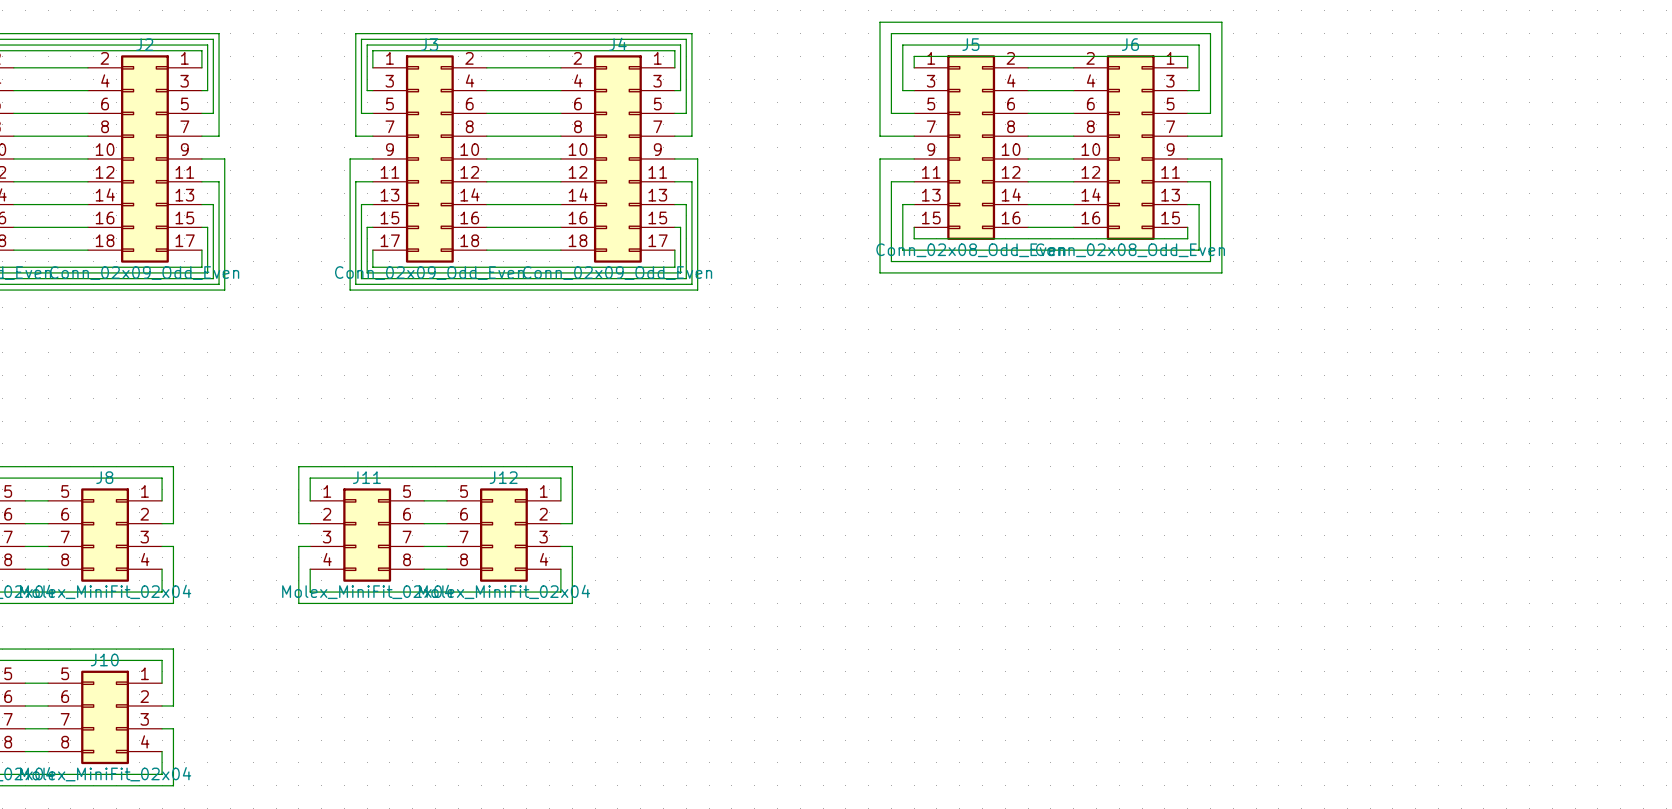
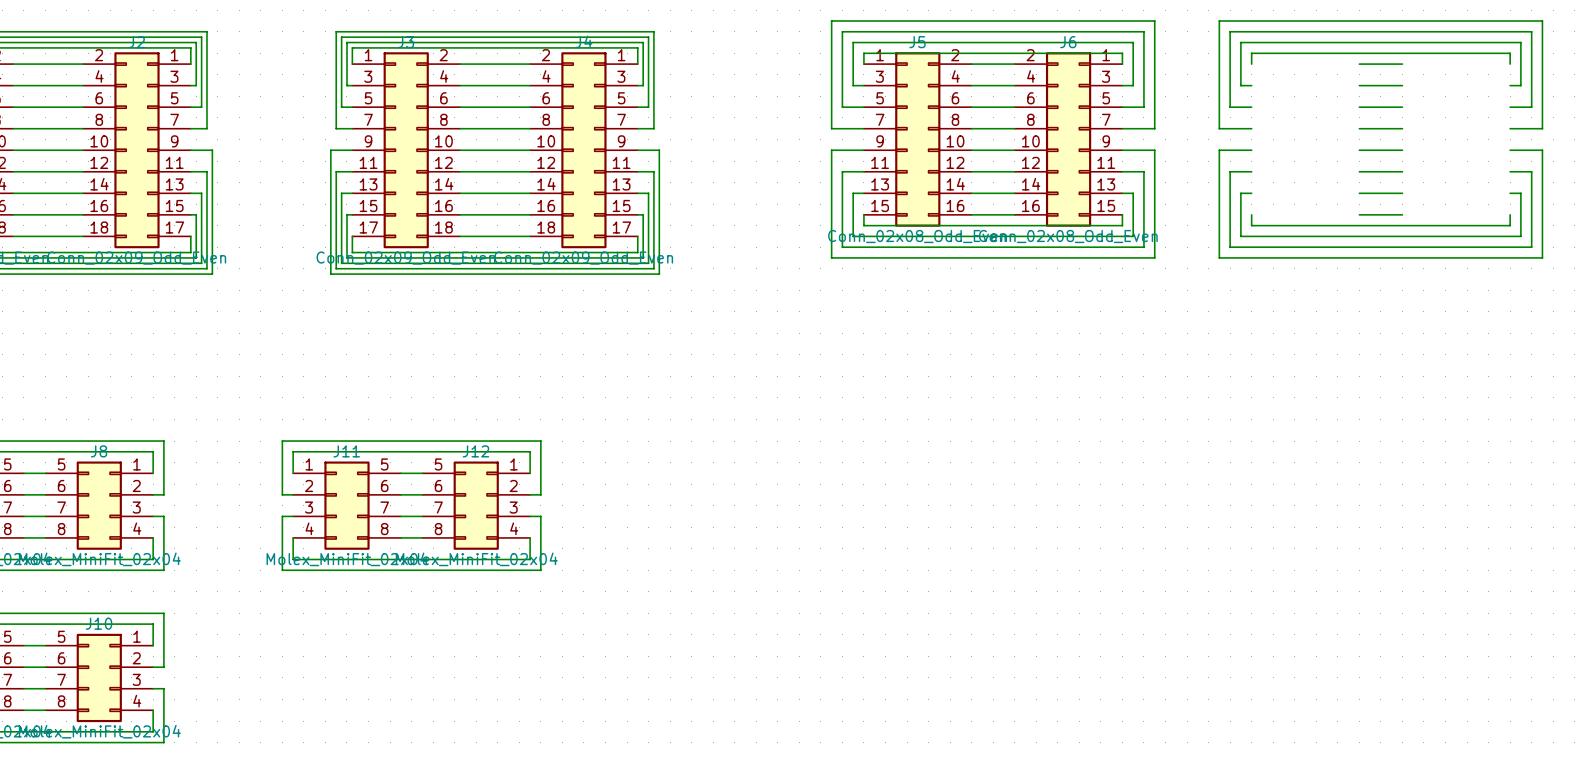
wire: none -> (1251, 64) (1251, 53) (1510, 53) (1510, 64)
wire: none -> (1359, 64) (1402, 64)
wire: none -> (1251, 85) (1240, 85) (1240, 42) (1520, 42) (1520, 85) (1510, 85)
wire: none -> (1359, 85) (1402, 85)
wire: none -> (1251, 107) (1230, 107) (1230, 31) (1531, 31) (1531, 107) (1510, 107)
wire: none -> (1359, 107) (1402, 107)
wire: none -> (1251, 128) (1219, 128) (1219, 21) (1542, 21) (1542, 128) (1510, 128)
wire: none -> (1359, 128) (1402, 128)
wire: none -> (1251, 150) (1219, 150) (1219, 257) (1542, 257) (1542, 150) (1510, 150)
wire: none -> (1359, 150) (1402, 150)
wire: none -> (1251, 171) (1230, 171) (1230, 247) (1531, 247) (1531, 171) (1510, 171)
wire: none -> (1359, 171) (1402, 171)
wire: none -> (1251, 193) (1240, 193) (1240, 236) (1520, 236) (1520, 193) (1510, 193)
wire: none -> (1359, 193) (1402, 193)
wire: none -> (1251, 214) (1251, 225) (1510, 225) (1510, 214)
wire: none -> (1359, 214) (1402, 214)

